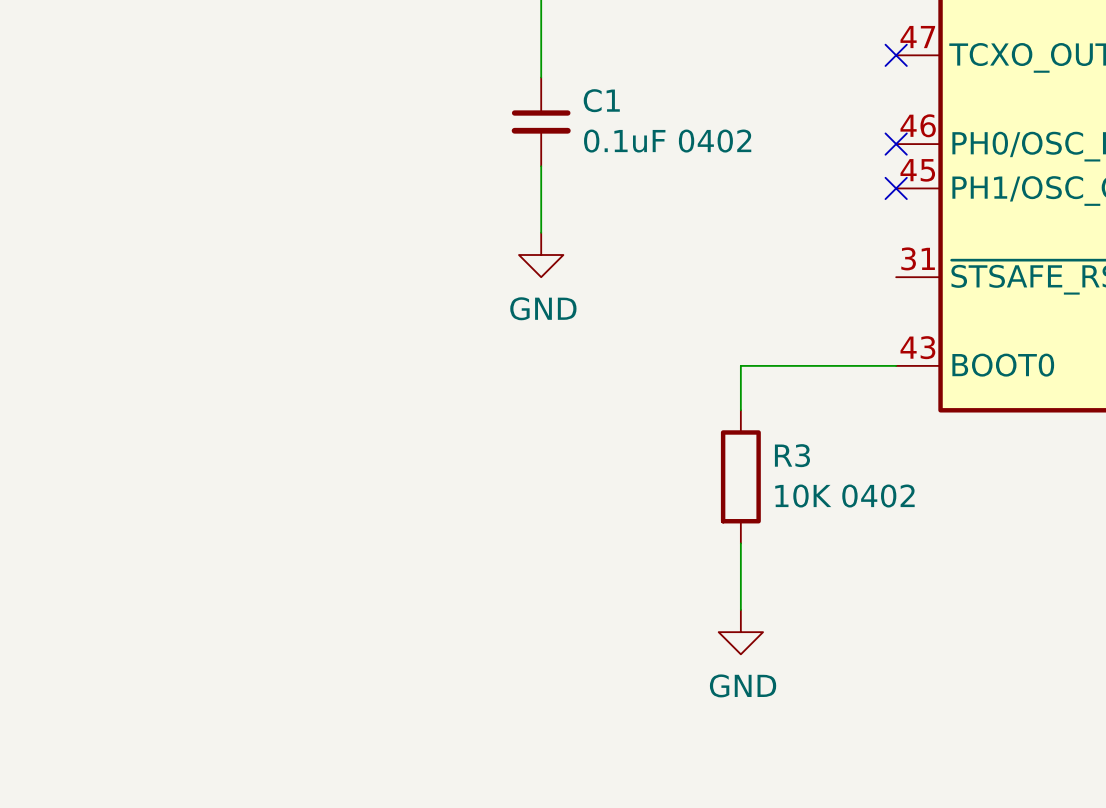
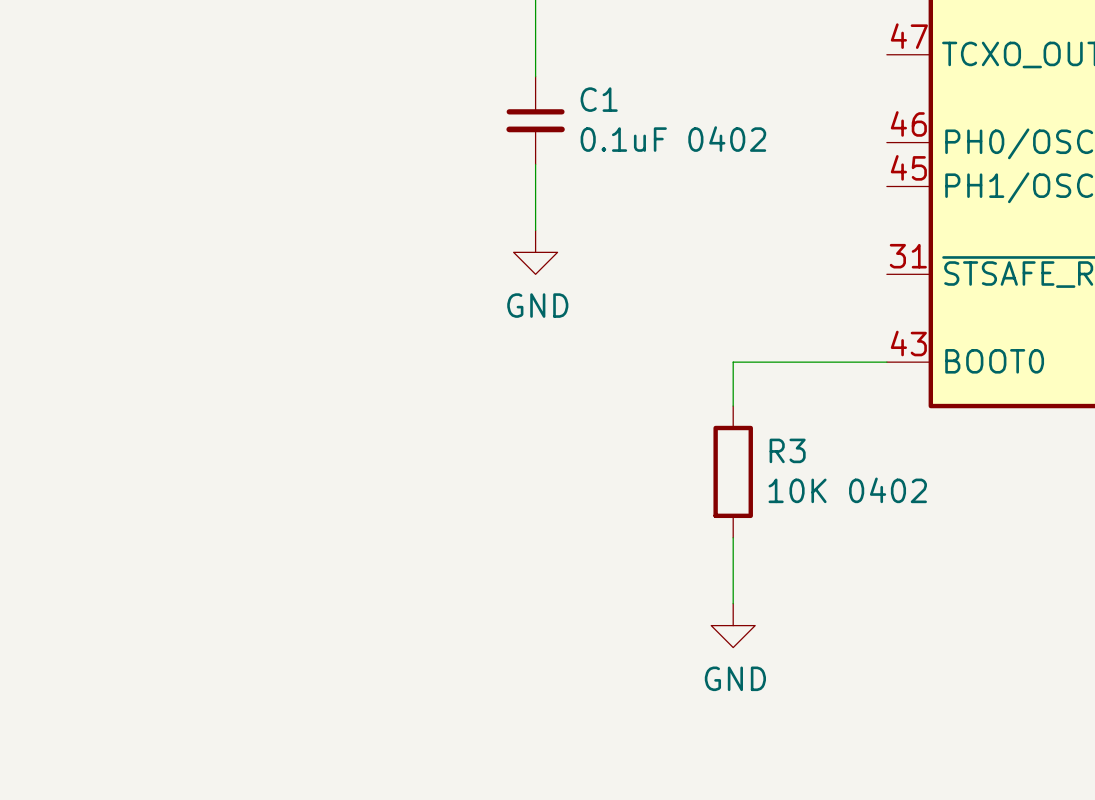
no-connect mark: (896, 55) -> none
no-connect mark: (896, 144) -> none
no-connect mark: (896, 188) -> none

